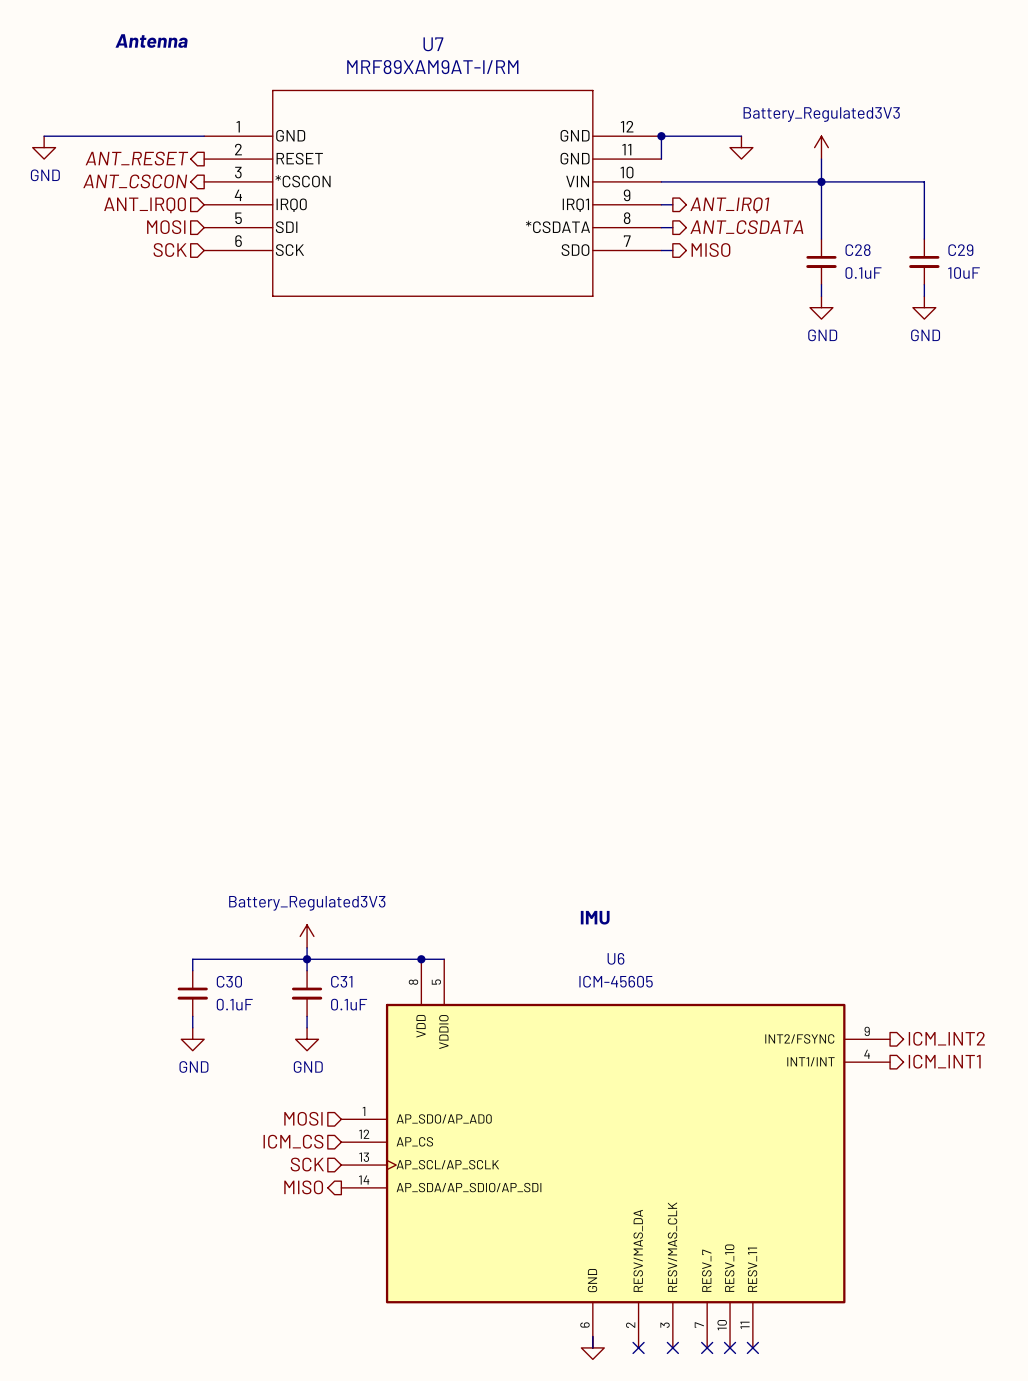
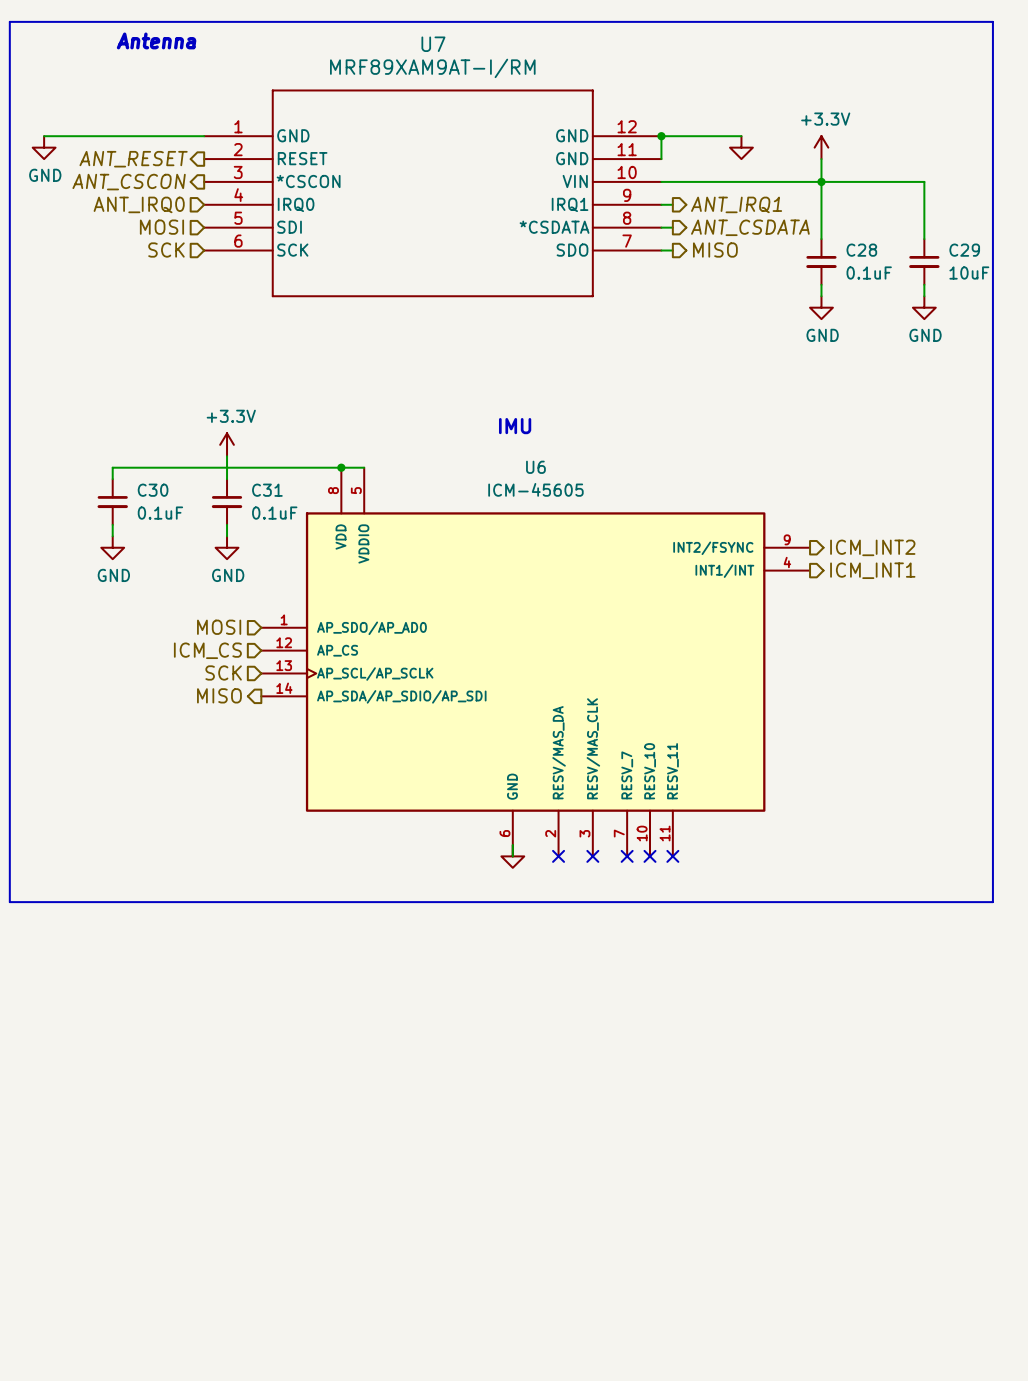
line: none -> (9, 21) (992, 21) (992, 902) (9, 902) (9, 21)
power symbol: Battery_Regulated3V3 (821, 147) -> +3.3V (821, 147)
text: none -> IMU (515, 426)
power symbol: none -> +3.3V (227, 444)
wire: none -> (227, 456) (227, 479)
junction: none -> (341, 467)
wire: none -> (364, 467) (112, 467) (112, 479)
wire: none -> (112, 524) (112, 536)
wire: none -> (227, 524) (227, 536)
power symbol: none -> GND (112, 547)
power symbol: none -> GND (227, 547)
hierarchical label: none -> ICM_INT2 (872, 547)
hierarchical label: none -> ICM_INT1 (872, 570)
hierarchical label: none -> MOSI (219, 627)
hierarchical label: none -> ICM_CS (207, 650)
hierarchical label: none -> SCK (223, 672)
hierarchical label: none -> MISO (219, 695)
wire: none -> (512, 844) (512, 856)
power symbol: none -> (512, 856)
no-connect mark: none -> (558, 856)
no-connect mark: none -> (592, 856)
no-connect mark: none -> (627, 856)
no-connect mark: none -> (650, 856)
no-connect mark: none -> (672, 856)
text: IMU (595, 917) -> none
power symbol: Battery_Regulated3V3 (307, 936) -> none
wire: (307, 947) (307, 970) -> none
junction: (307, 959) -> none
junction: (421, 959) -> none
wire: (444, 959) (192, 959) (192, 970) -> none
C30 position: (192, 993) -> (112, 502)
C31 position: (307, 993) -> (227, 502)
wire: (192, 1016) (192, 1027) -> none
wire: (307, 1016) (307, 1027) -> none
hierarchical label: ICM_INT2 (946, 1038) -> none
power symbol: GND (192, 1039) -> none
power symbol: GND (307, 1039) -> none
hierarchical label: ICM_INT1 (944, 1061) -> none
hierarchical label: MOSI (303, 1118) -> none
hierarchical label: ICM_CS (293, 1141) -> none
U6 position: (615, 1153) -> (535, 662)
hierarchical label: SCK (307, 1164) -> none
hierarchical label: MISO (303, 1187) -> none
wire: (592, 1336) (592, 1347) -> none
power symbol: (592, 1347) -> none
no-connect mark: (638, 1347) -> none
no-connect mark: (672, 1347) -> none
no-connect mark: (707, 1347) -> none
no-connect mark: (730, 1347) -> none
no-connect mark: (752, 1347) -> none

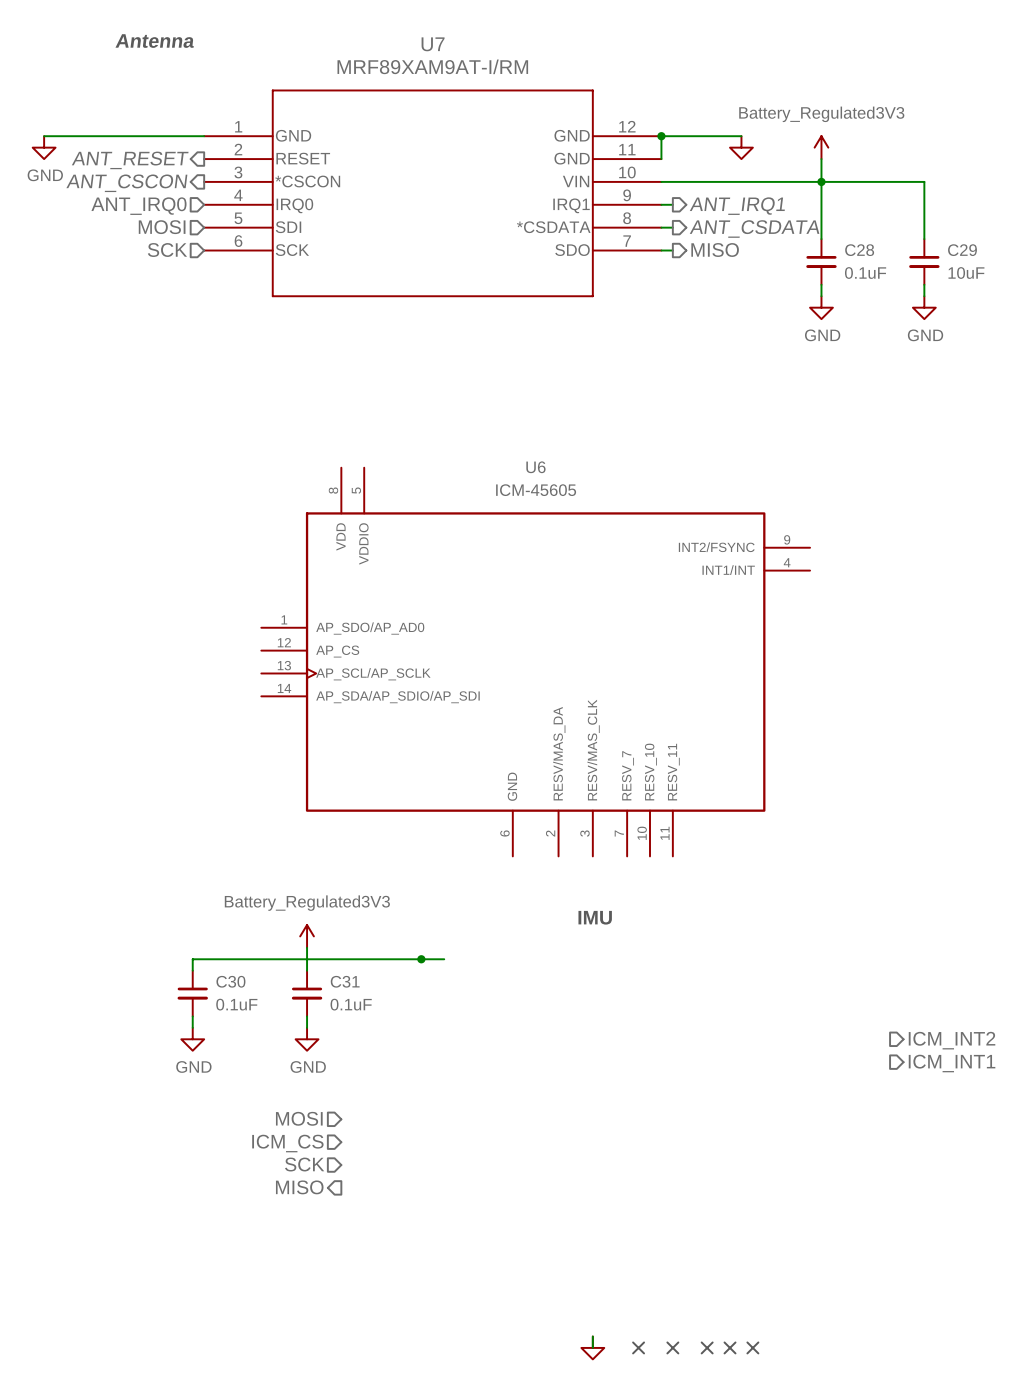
line: (9, 21) (992, 21) (992, 902) (9, 902) (9, 21) -> none
power symbol: +3.3V (821, 147) -> Battery_Regulated3V3 (821, 147)
text: IMU (515, 426) -> none
power symbol: +3.3V (227, 444) -> none
wire: (227, 456) (227, 479) -> none
junction: (341, 467) -> none
wire: (364, 467) (112, 467) (112, 479) -> none
C30 position: (112, 502) -> (192, 993)
C31 position: (227, 502) -> (307, 993)
wire: (112, 524) (112, 536) -> none
wire: (227, 524) (227, 536) -> none
power symbol: GND (112, 547) -> none
power symbol: GND (227, 547) -> none
hierarchical label: ICM_INT2 (872, 547) -> none
hierarchical label: ICM_INT1 (872, 570) -> none
hierarchical label: MOSI (219, 627) -> none
hierarchical label: ICM_CS (207, 650) -> none
hierarchical label: SCK (223, 672) -> none
hierarchical label: MISO (219, 695) -> none
power symbol: (512, 856) -> none
no-connect mark: (558, 856) -> none
no-connect mark: (592, 856) -> none
no-connect mark: (627, 856) -> none
no-connect mark: (650, 856) -> none
no-connect mark: (672, 856) -> none
text: none -> IMU (595, 917)
power symbol: none -> Battery_Regulated3V3 (307, 936)
wire: none -> (307, 947) (307, 970)
junction: none -> (421, 959)
wire: none -> (444, 959) (192, 959) (192, 970)
wire: none -> (192, 1016) (192, 1027)
wire: none -> (307, 1016) (307, 1027)
power symbol: none -> GND (192, 1039)
power symbol: none -> GND (307, 1039)
hierarchical label: none -> ICM_INT2 (952, 1040)
hierarchical label: none -> ICM_INT1 (952, 1063)
hierarchical label: none -> MOSI (299, 1118)
hierarchical label: none -> ICM_CS (287, 1143)
hierarchical label: none -> SCK (304, 1164)
hierarchical label: none -> MISO (299, 1187)
wire: none -> (592, 1336) (592, 1347)
power symbol: none -> (592, 1347)
no-connect mark: none -> (638, 1347)
no-connect mark: none -> (672, 1347)
no-connect mark: none -> (707, 1347)
no-connect mark: none -> (730, 1347)
no-connect mark: none -> (752, 1347)

